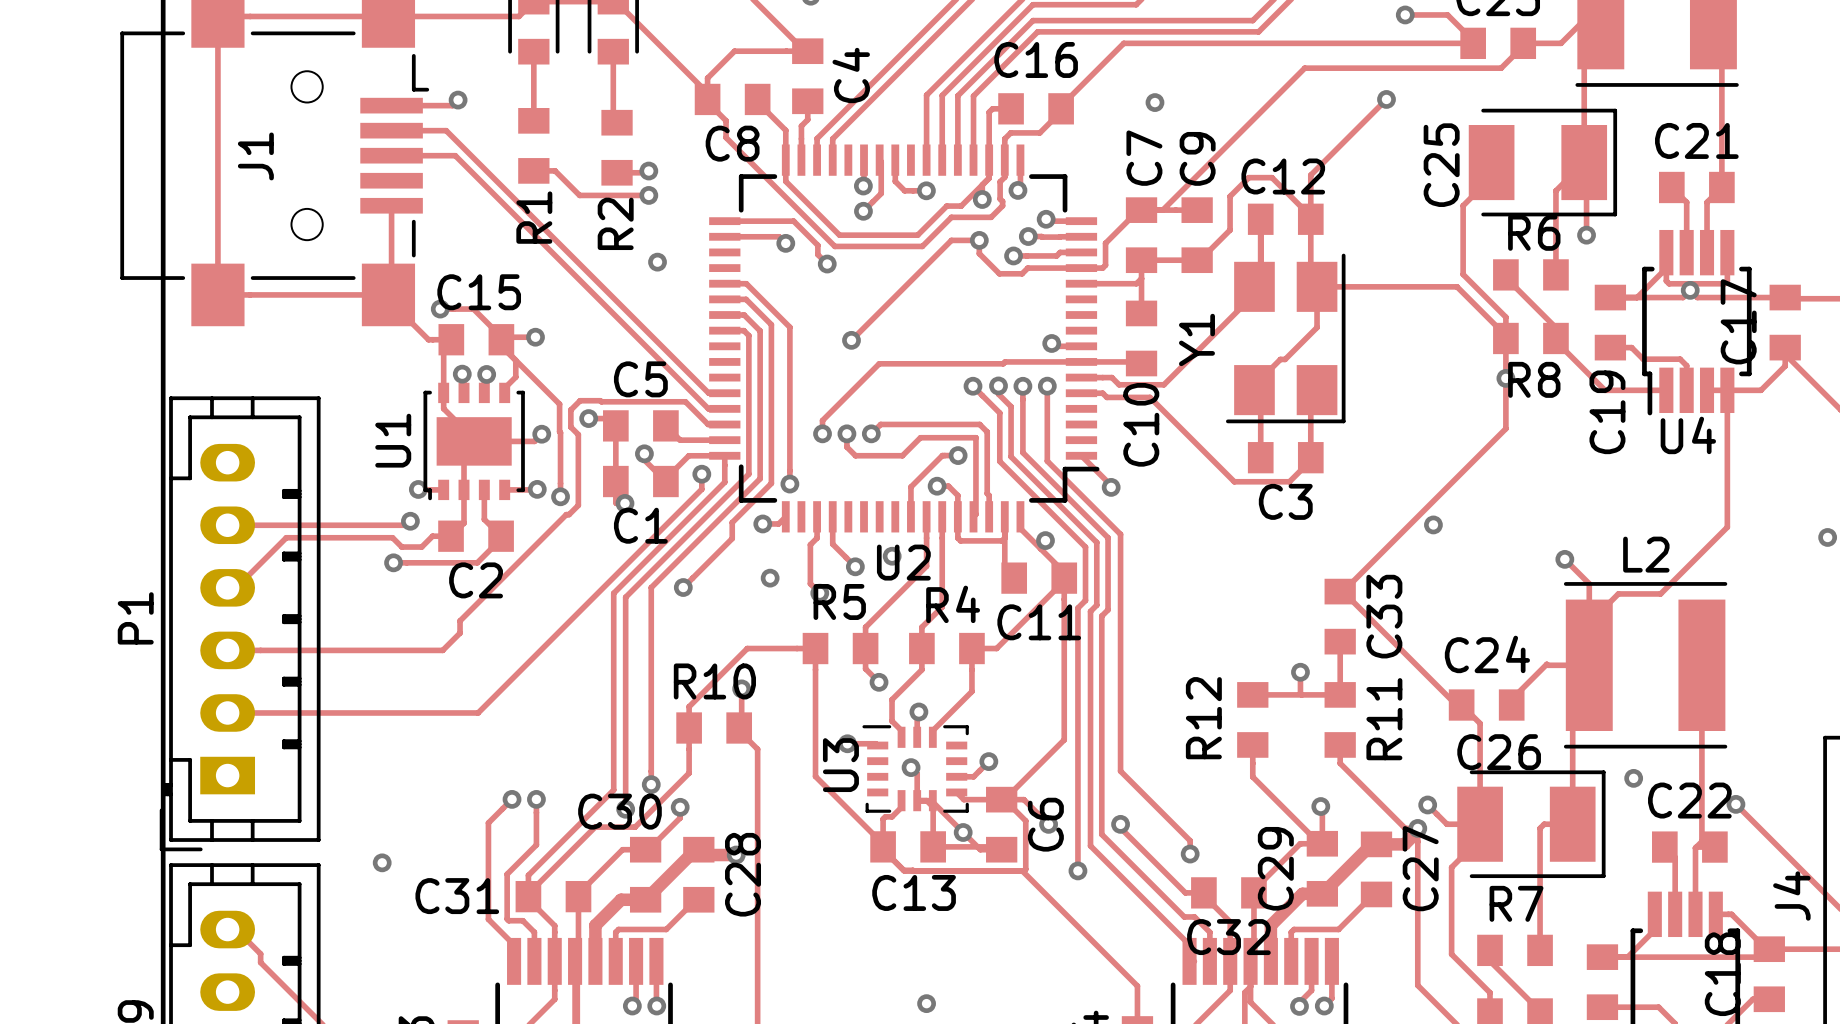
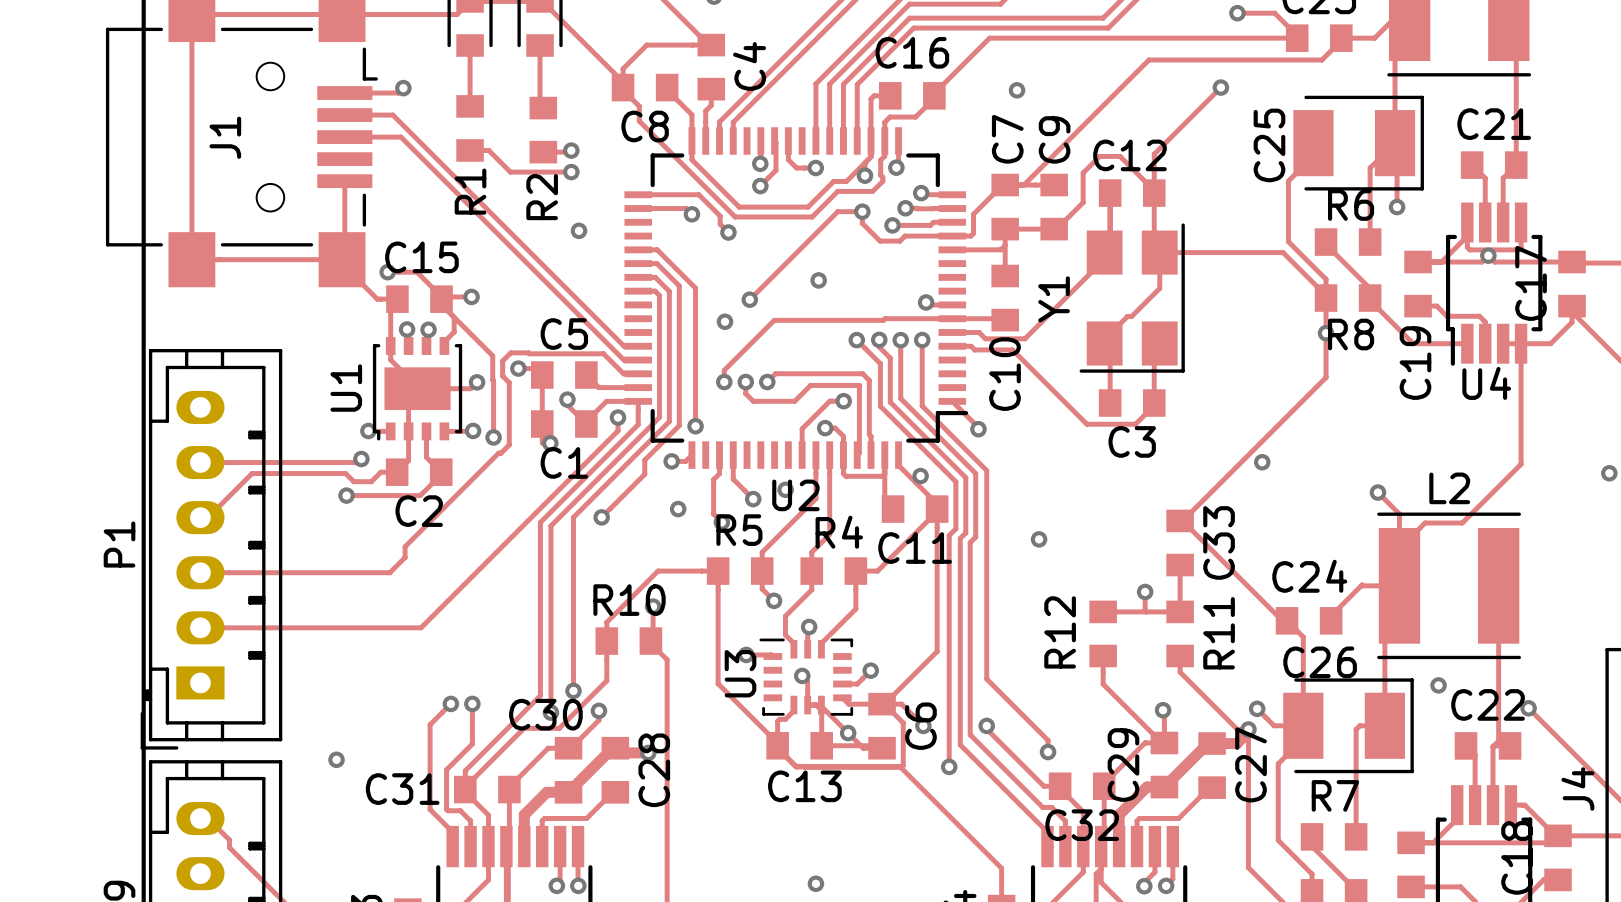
via: none -> (818, 280)
via: none -> (725, 321)
via: none -> (1039, 539)

